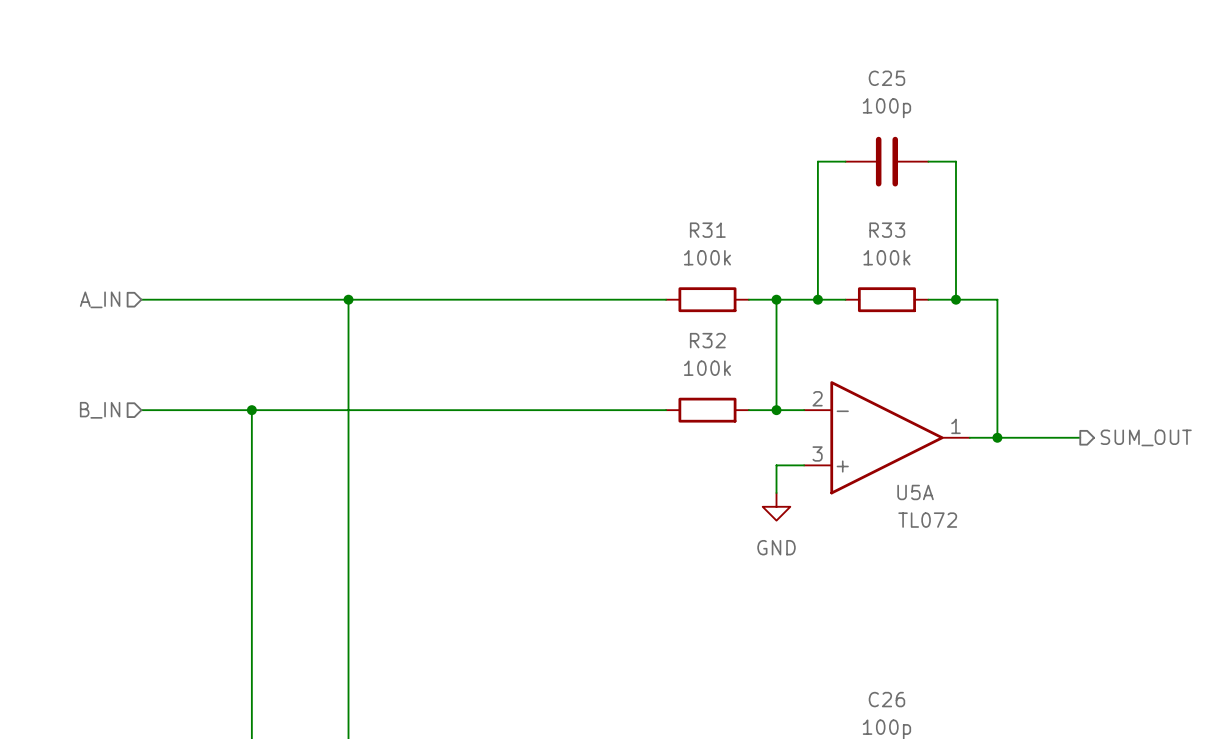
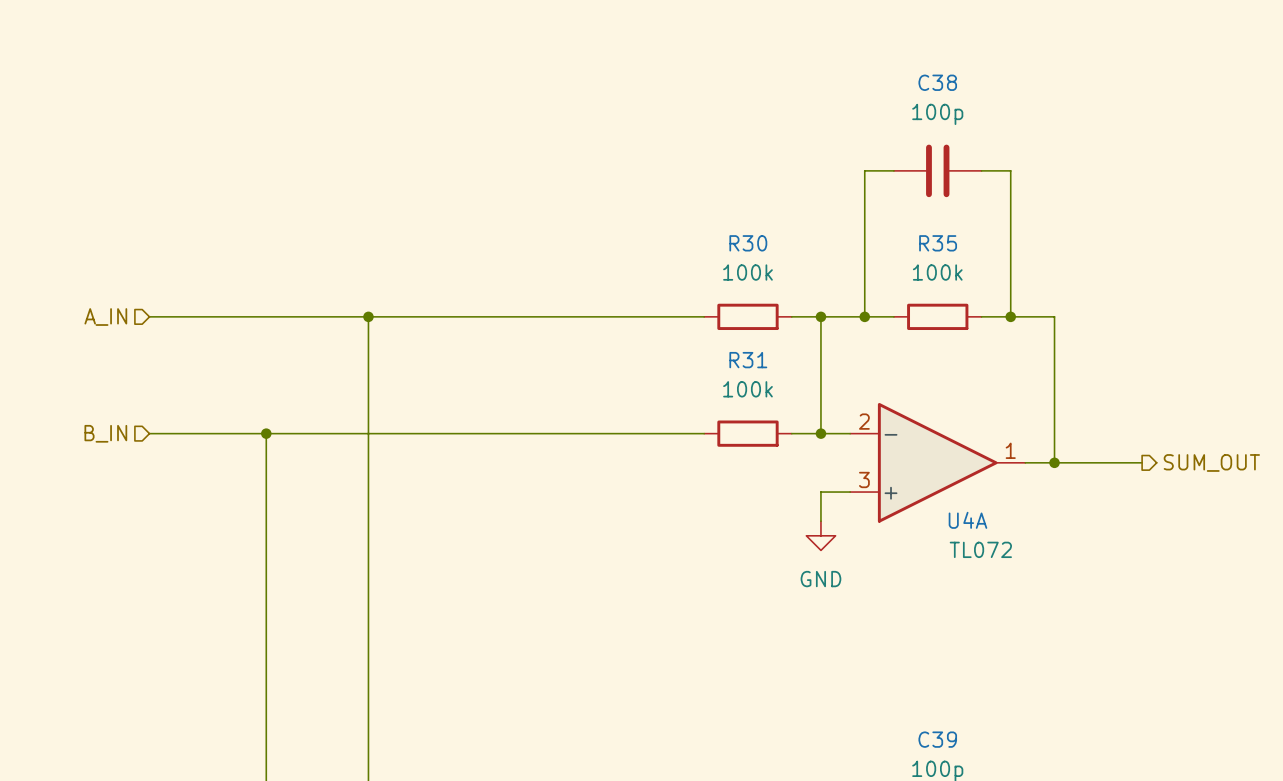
C25 name: C25 (886, 78) -> C38 (937, 82)
R31 name: R31 (707, 230) -> R30 (748, 243)
R33 name: R33 (887, 230) -> R35 (938, 243)
R32 name: R32 (707, 340) -> R31 (748, 360)
U5A name: U5A (915, 492) -> U4A (967, 520)
C26 name: C26 (886, 699) -> C39 (937, 739)

